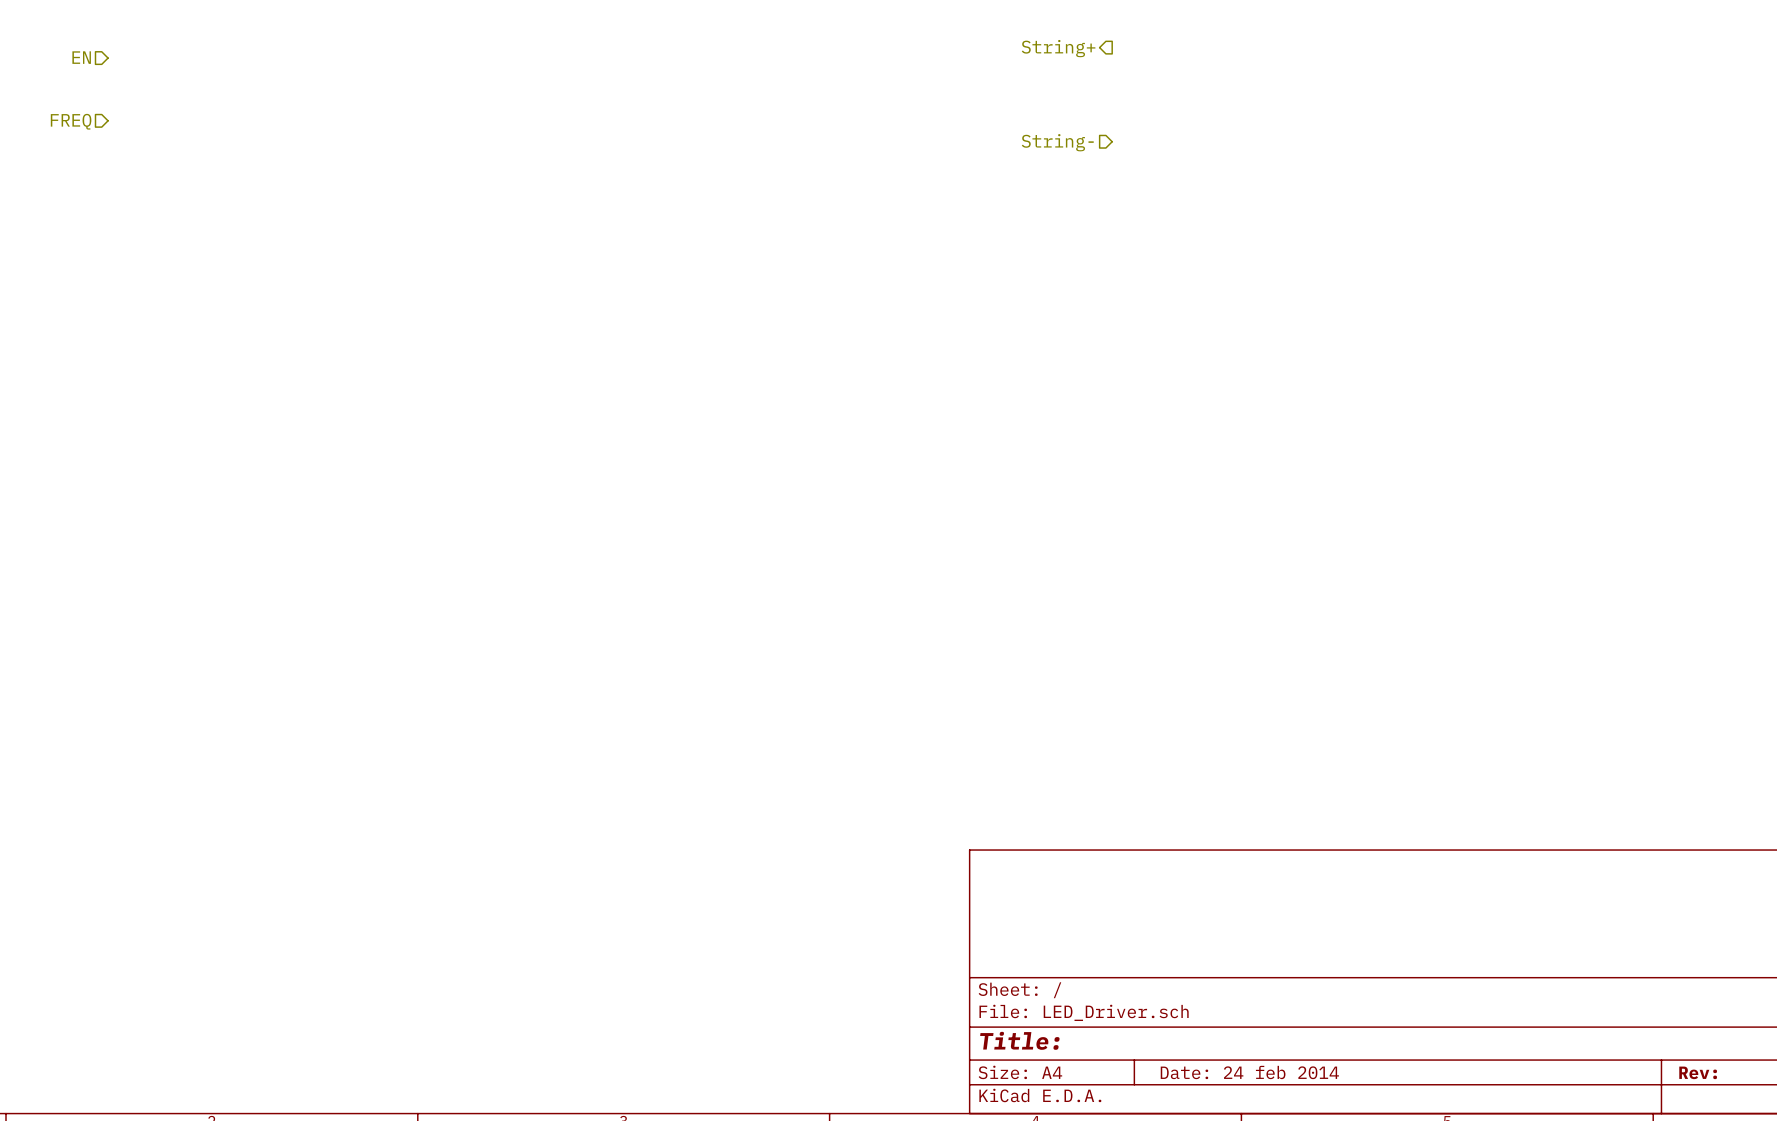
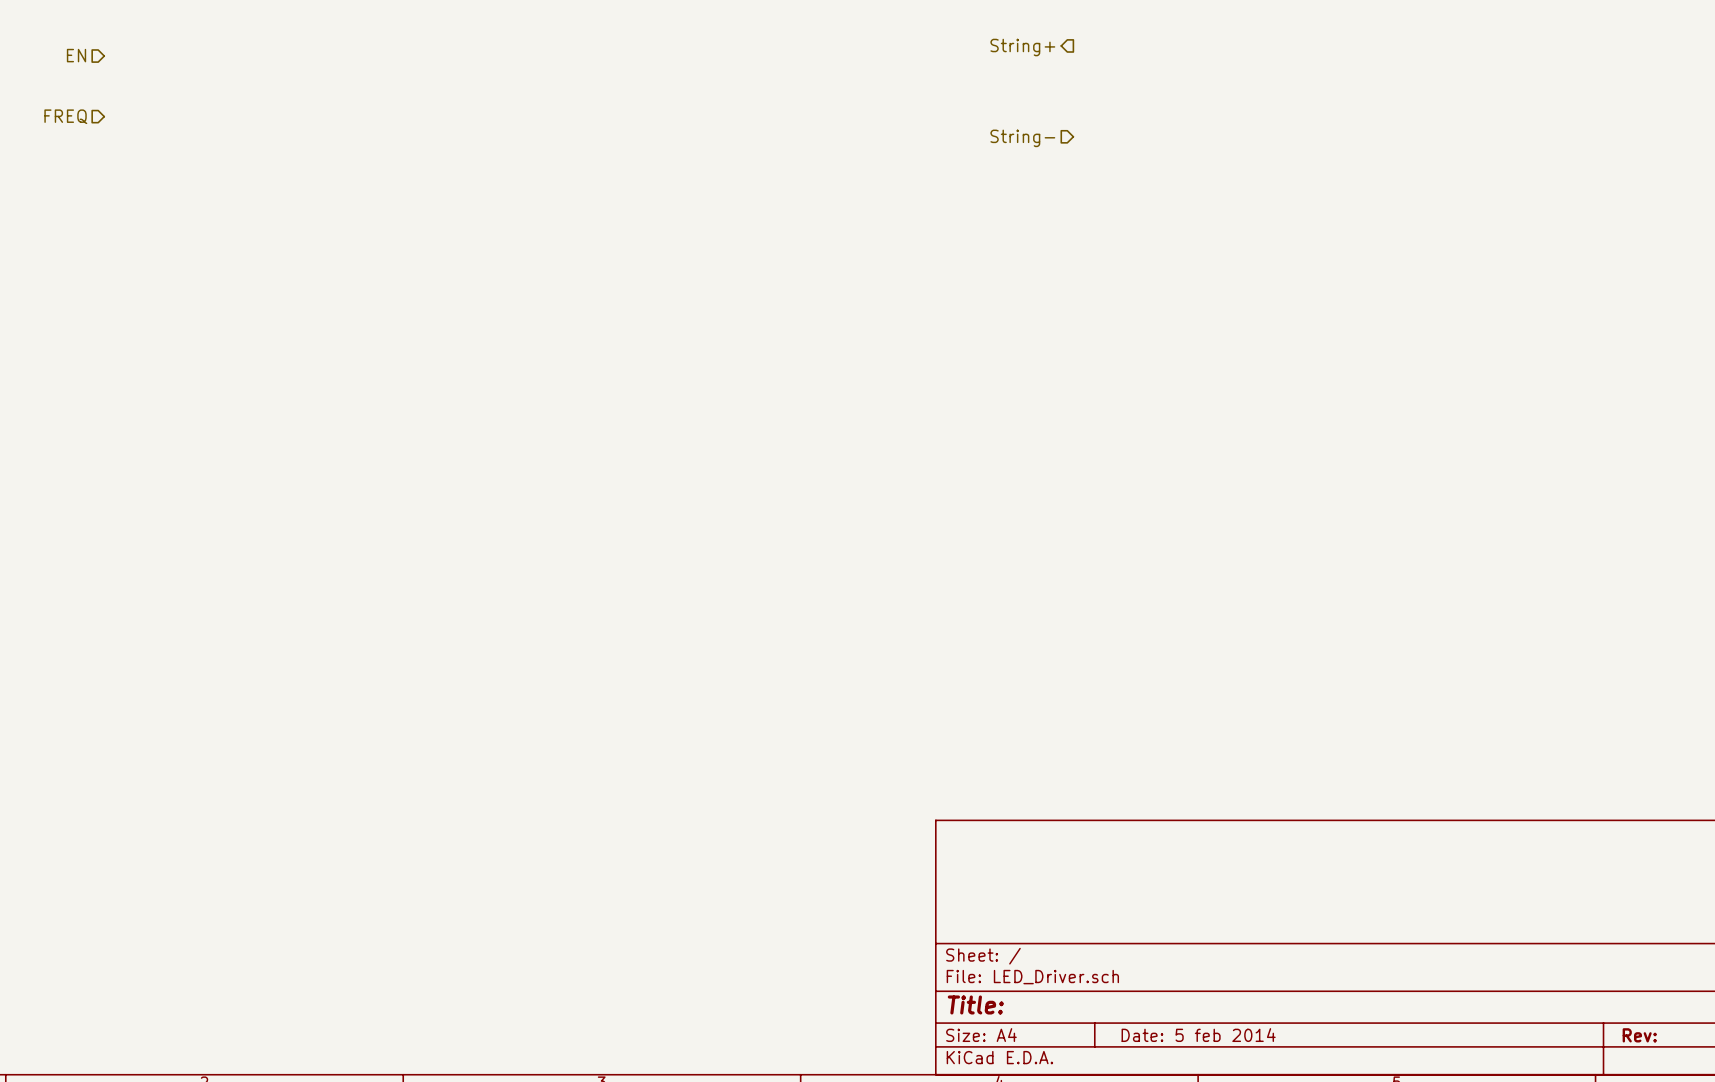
title block: Date: 24 feb 2014 (1249, 1072) -> Date: 5 feb 2014 (1198, 1035)

